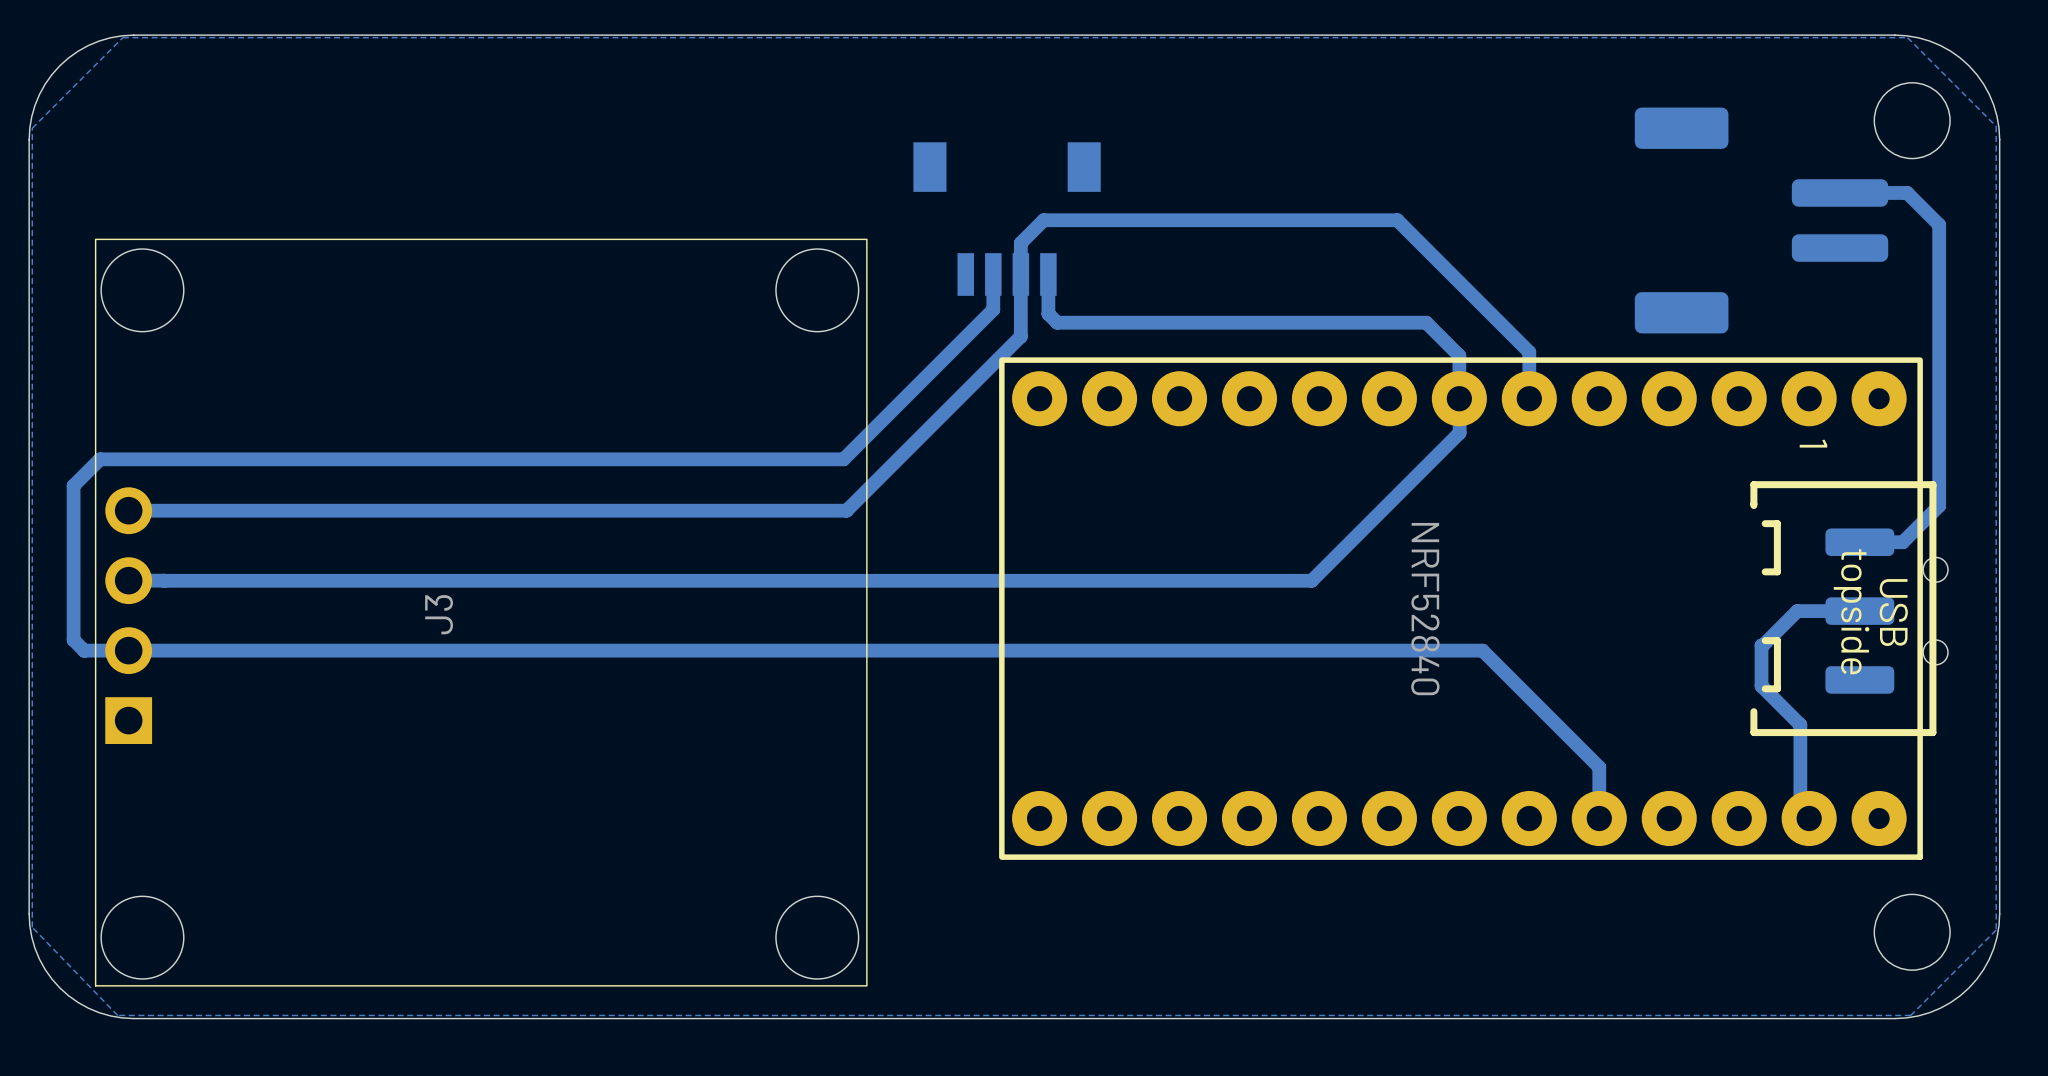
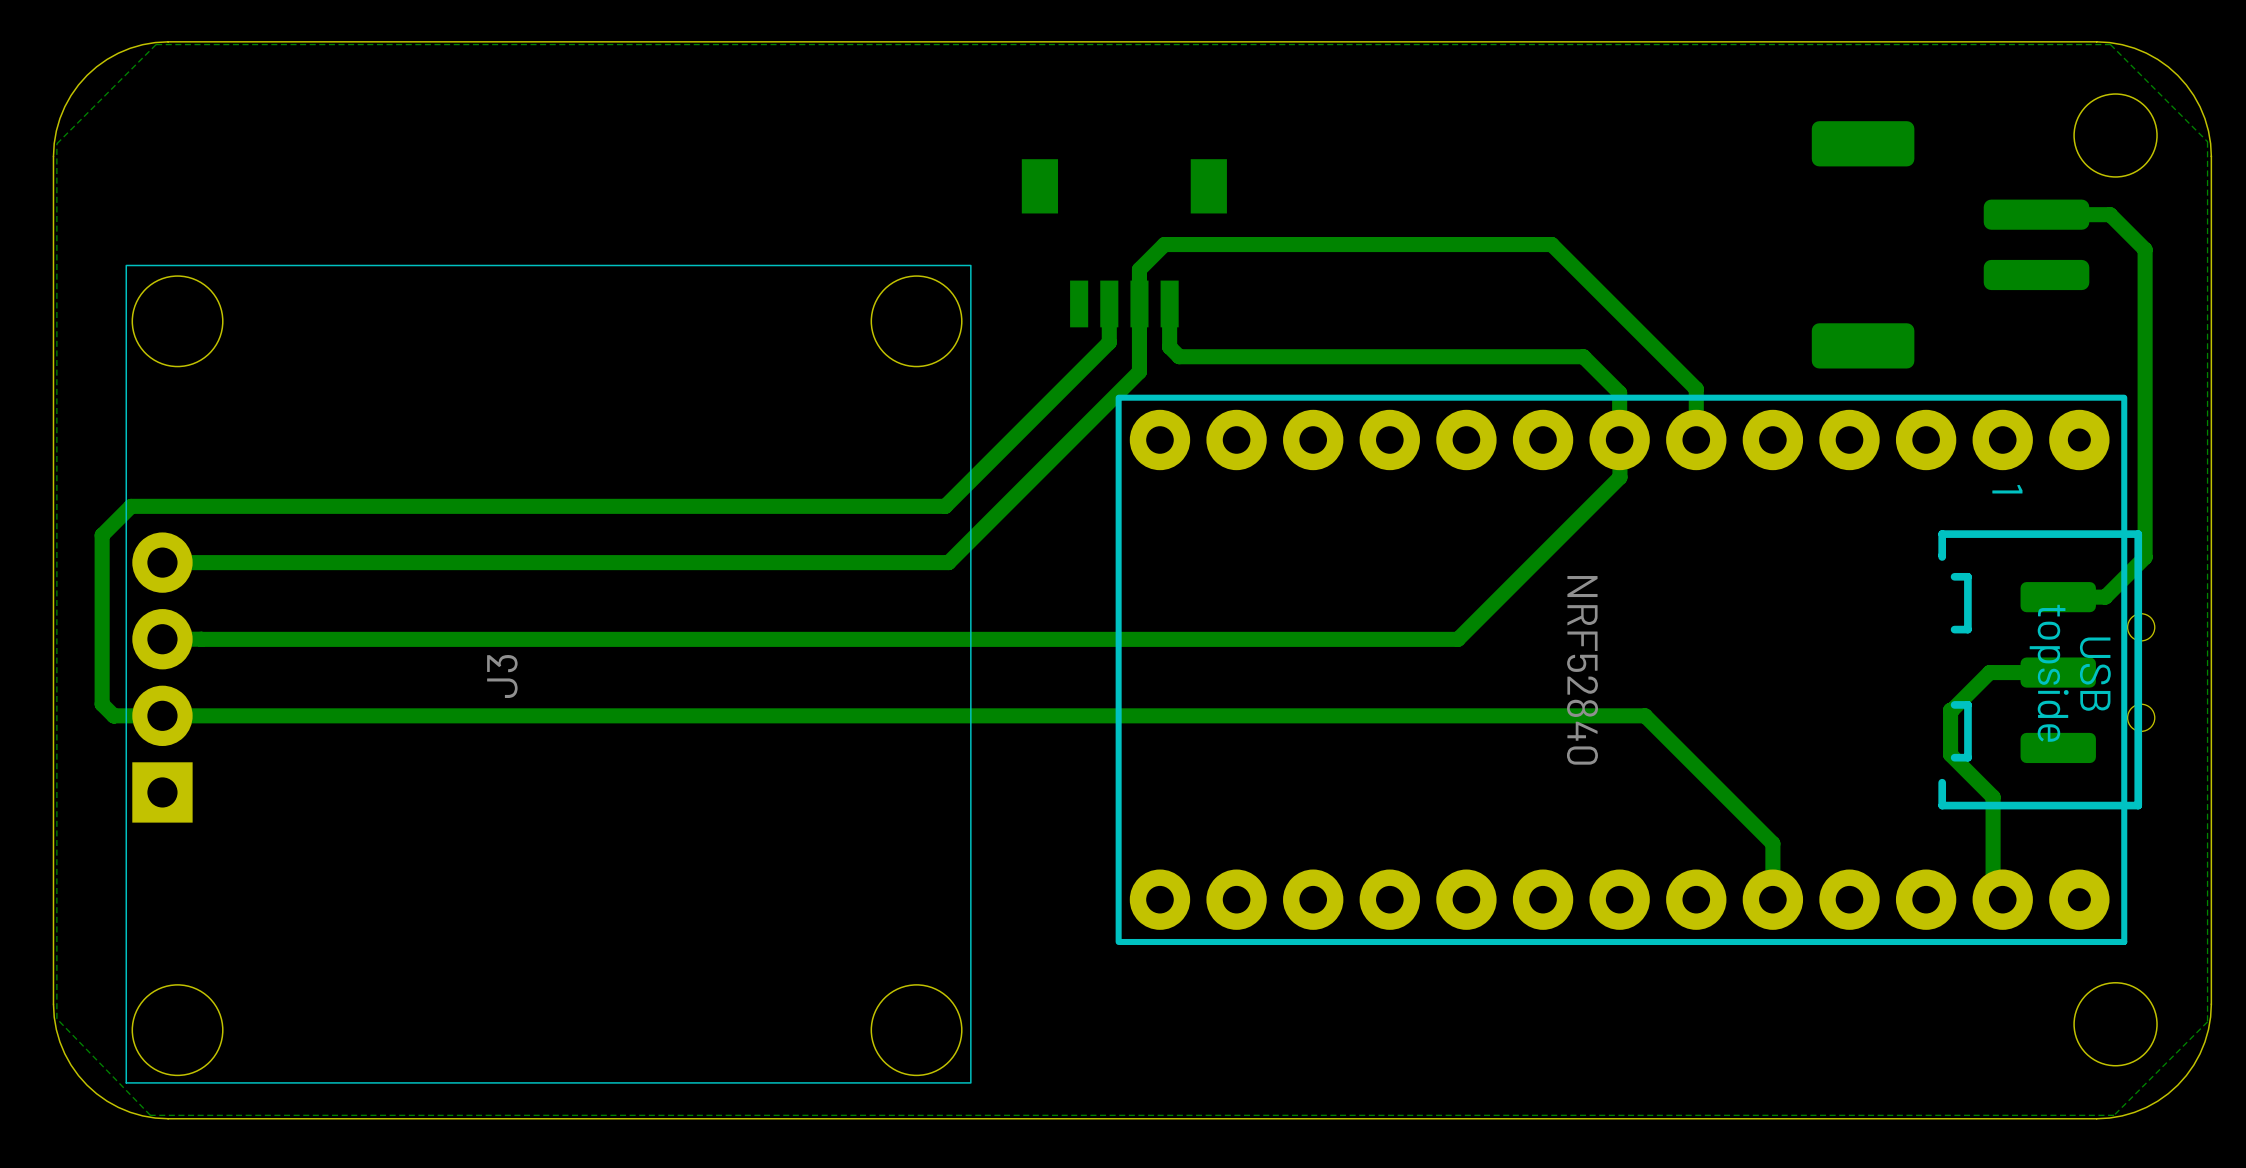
J3 footprint: [94, 238, 868, 987] -> [125, 264, 972, 1084]

